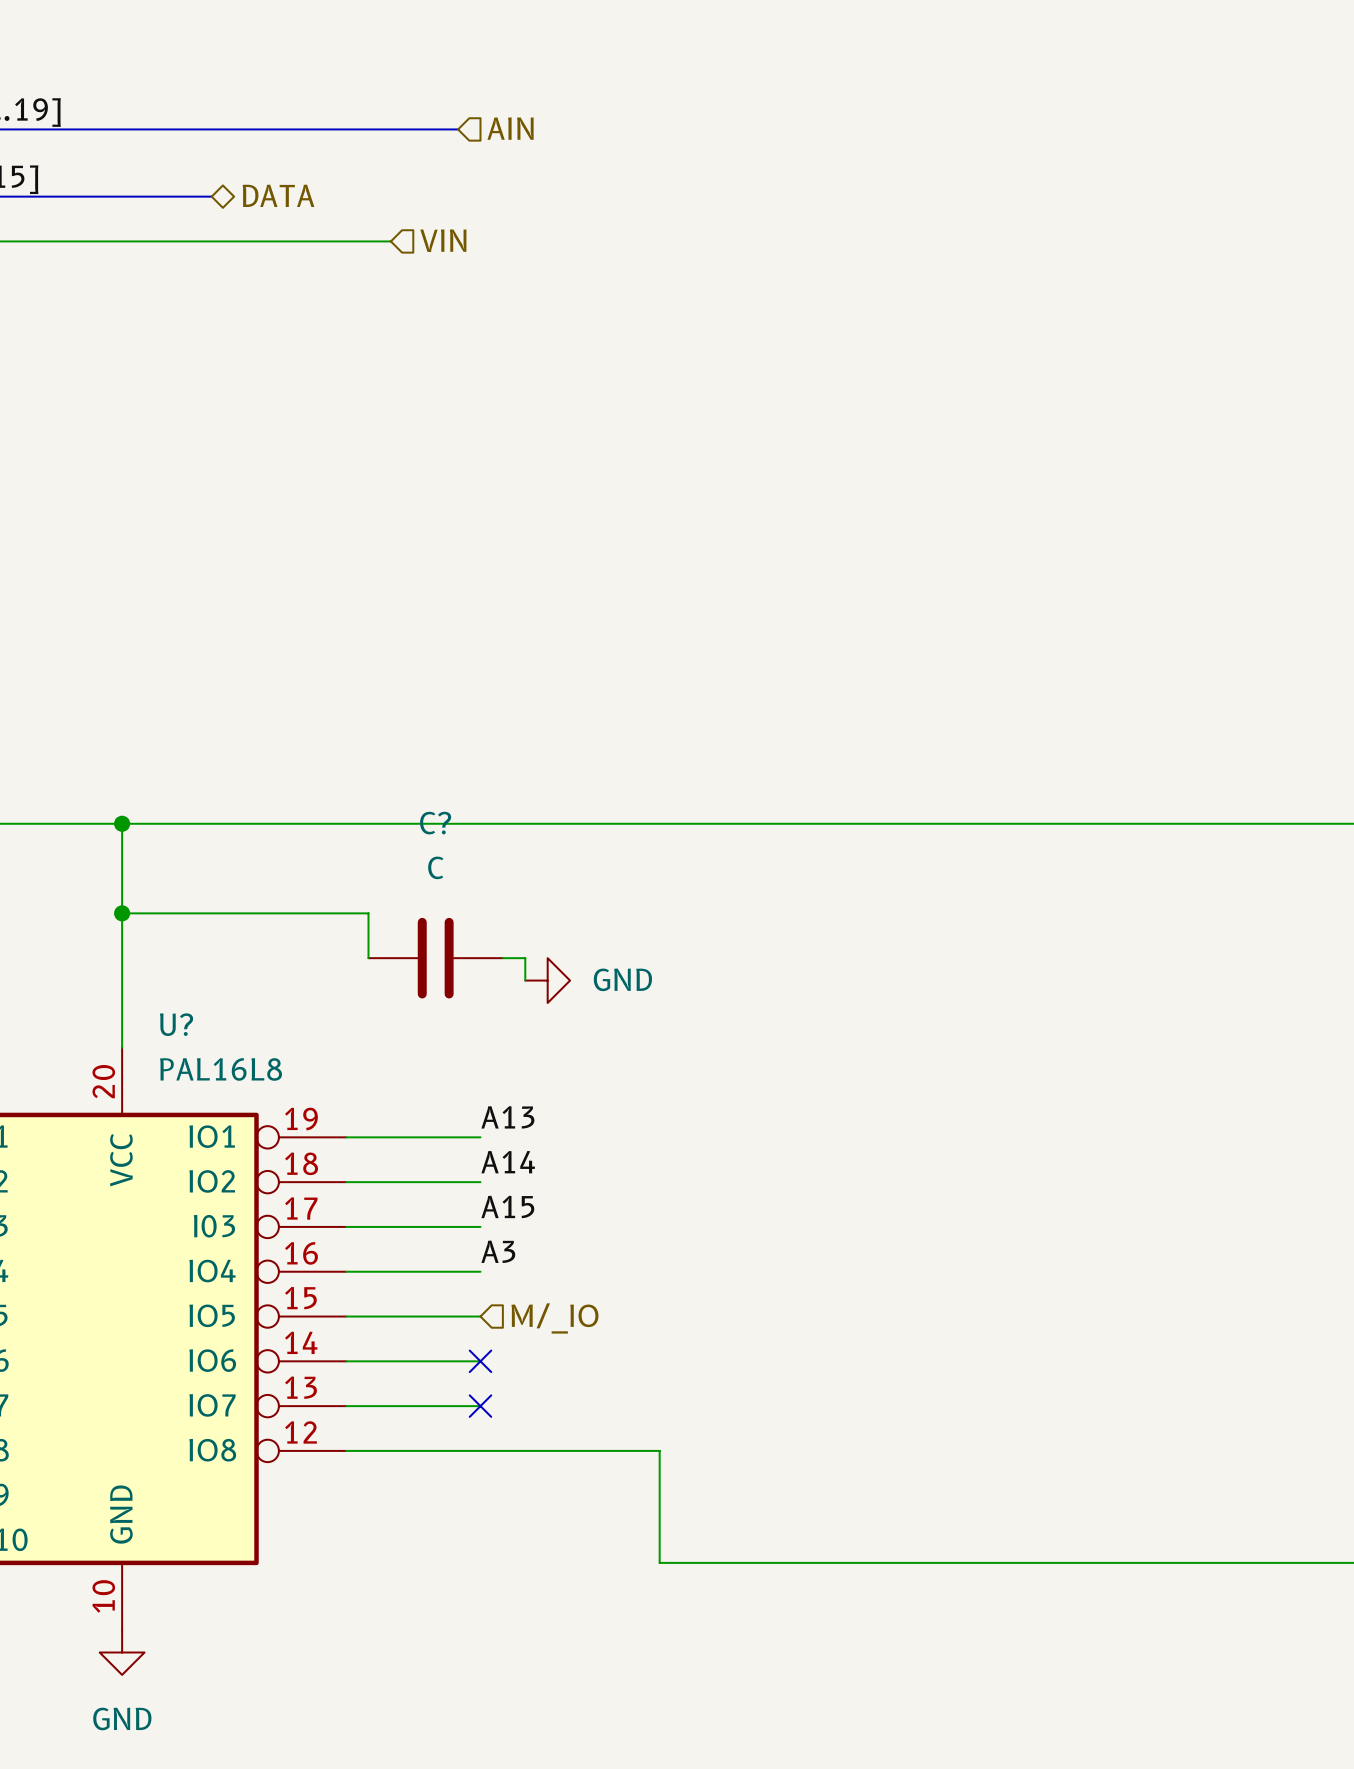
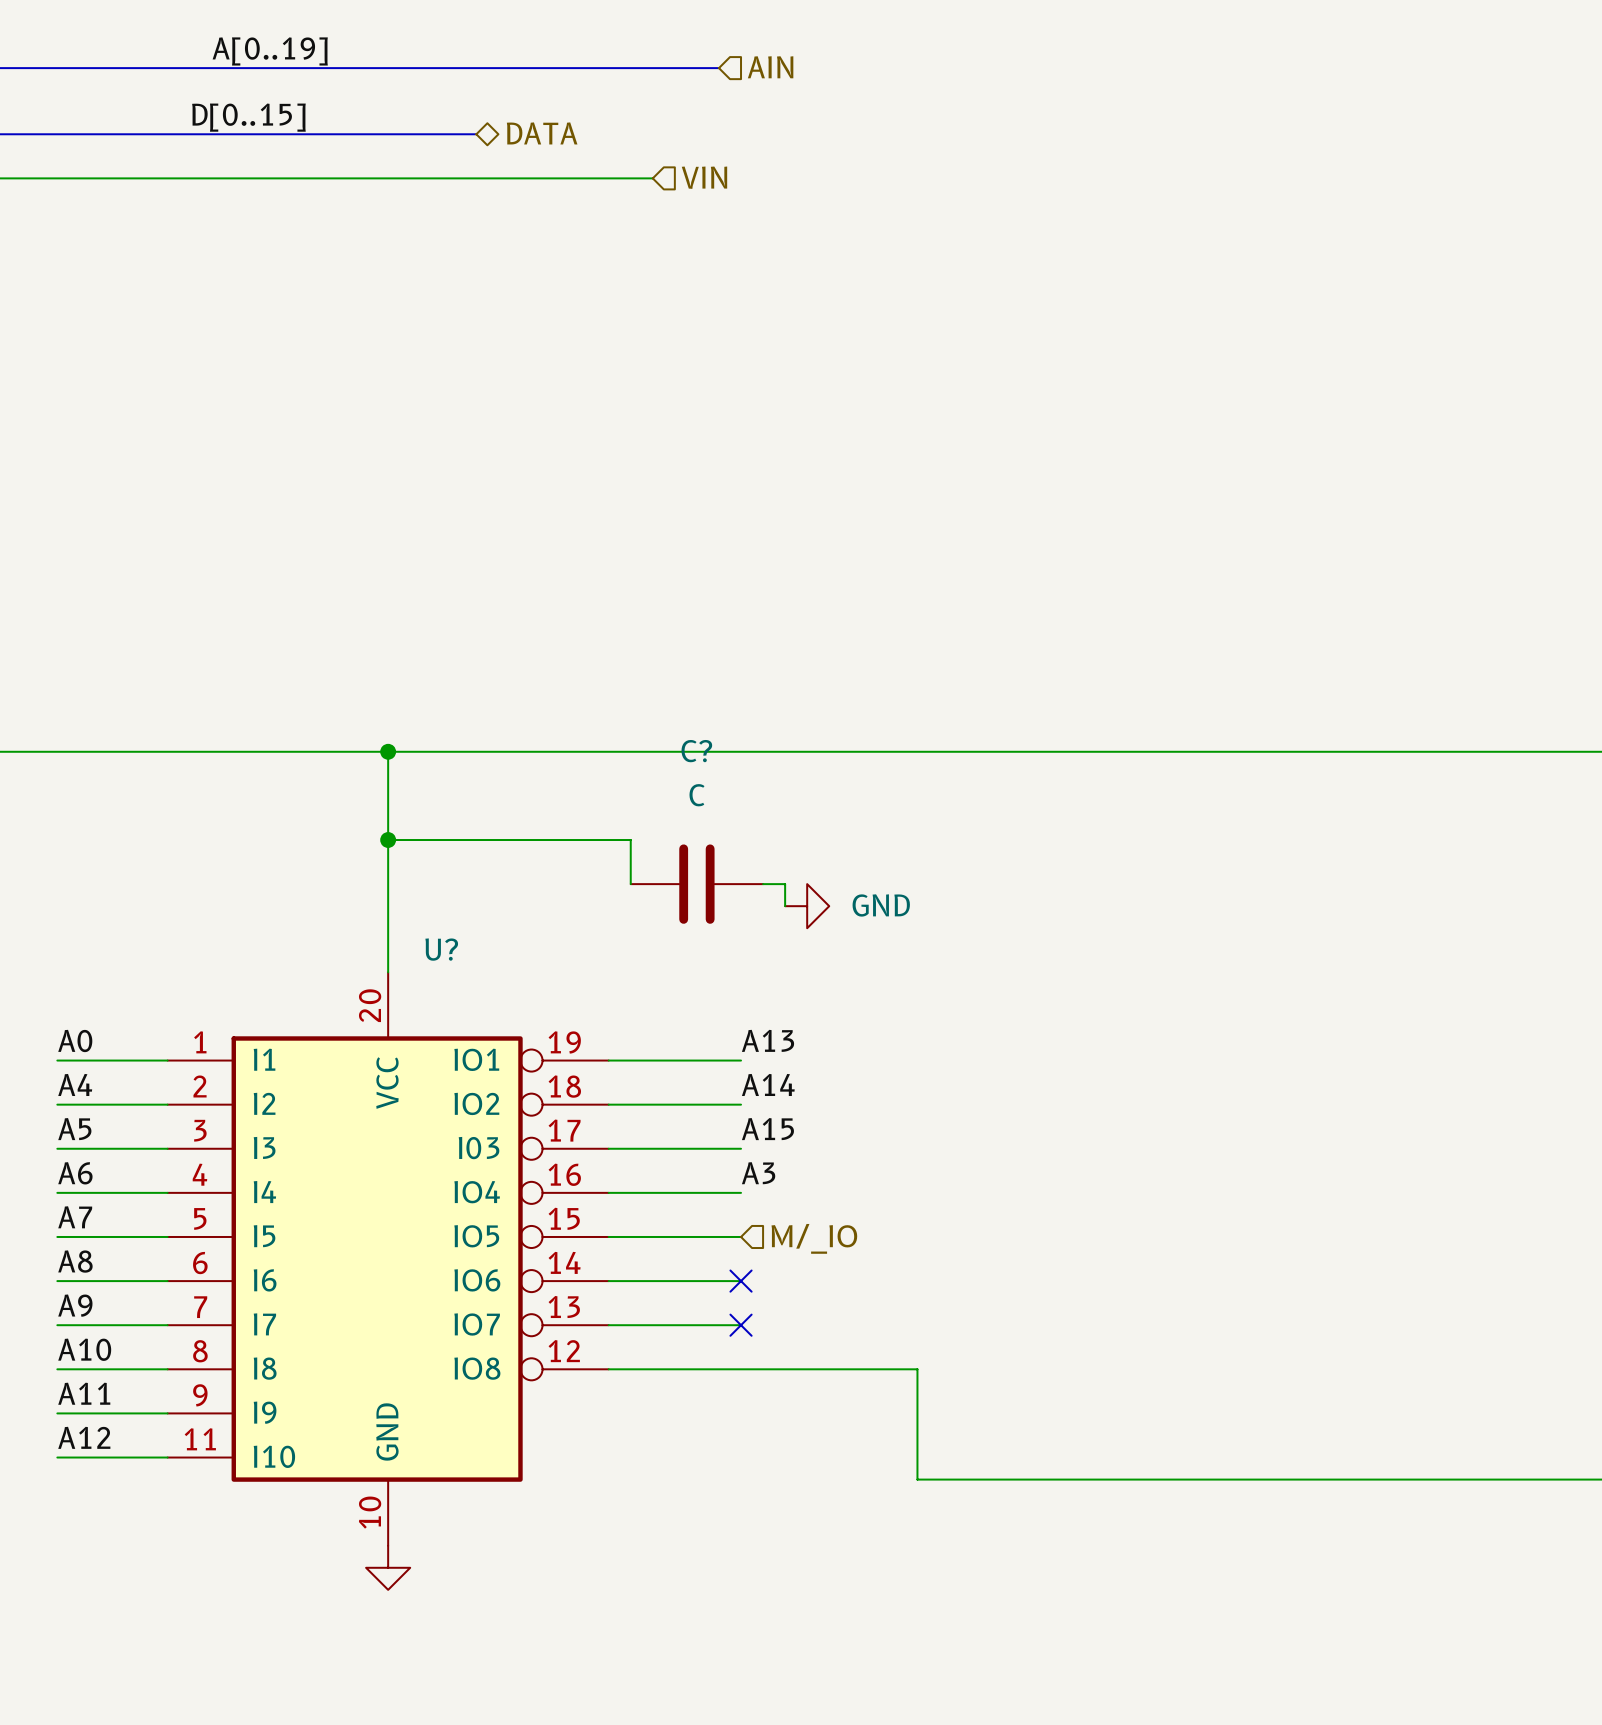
U? value: PAL16L8 (221, 1069) -> none
power symbol text: GND (122, 1718) -> none

